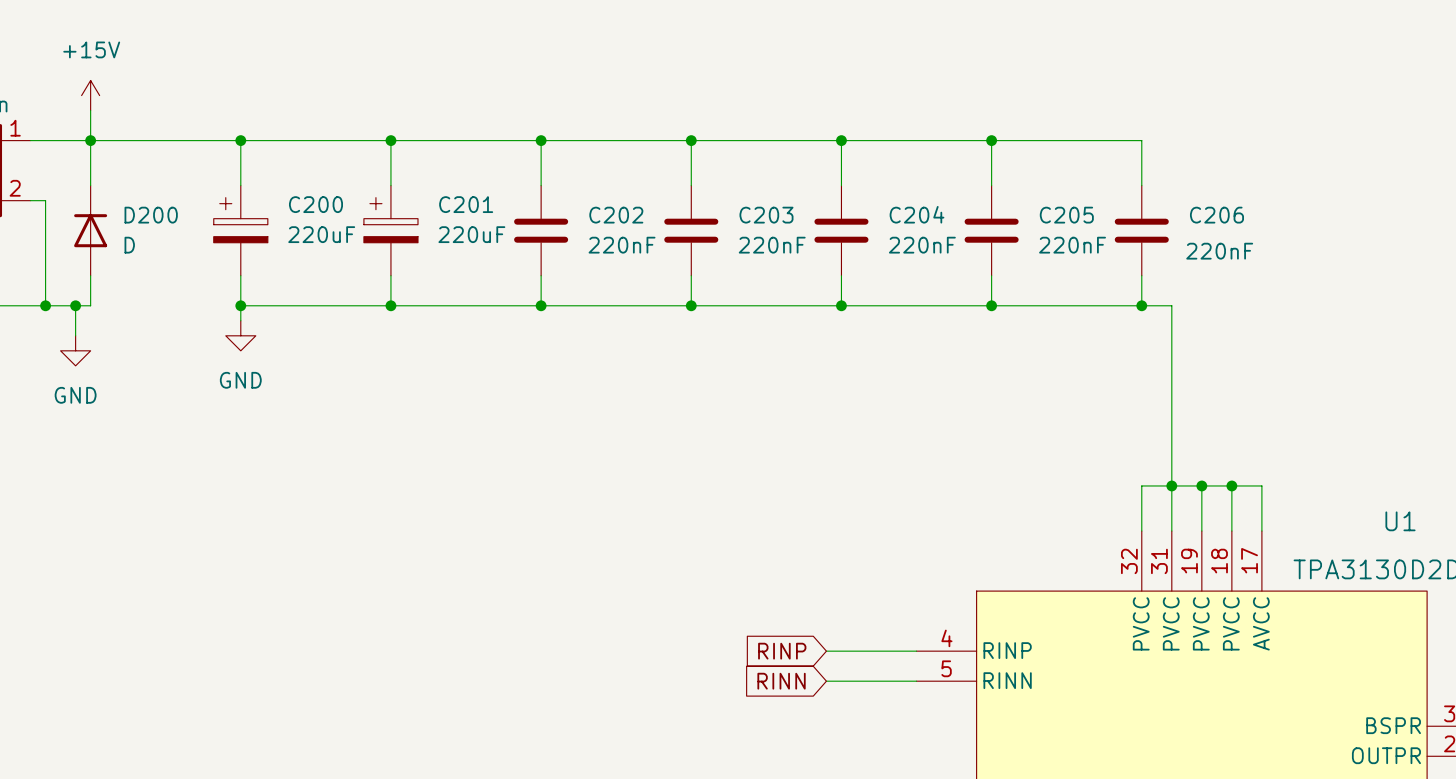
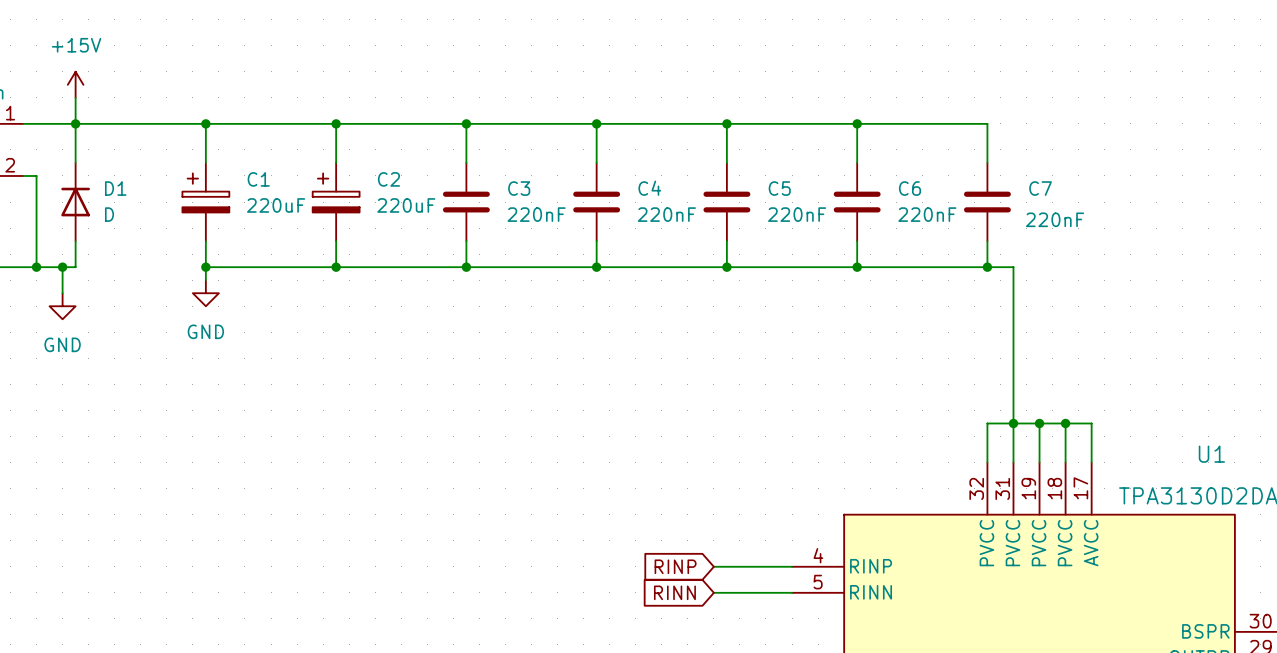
C200 name: C200 (315, 204) -> C1 (258, 179)
C201 name: C201 (466, 204) -> C2 (388, 179)
C204 name: C204 (917, 214) -> C5 (779, 188)
D200 name: D200 (151, 215) -> D1 (115, 188)
C202 name: C202 (616, 215) -> C3 (519, 188)
C203 name: C203 (766, 215) -> C4 (649, 188)
C205 name: C205 (1066, 215) -> C6 (909, 188)
C206 name: C206 (1216, 215) -> C7 (1040, 188)

